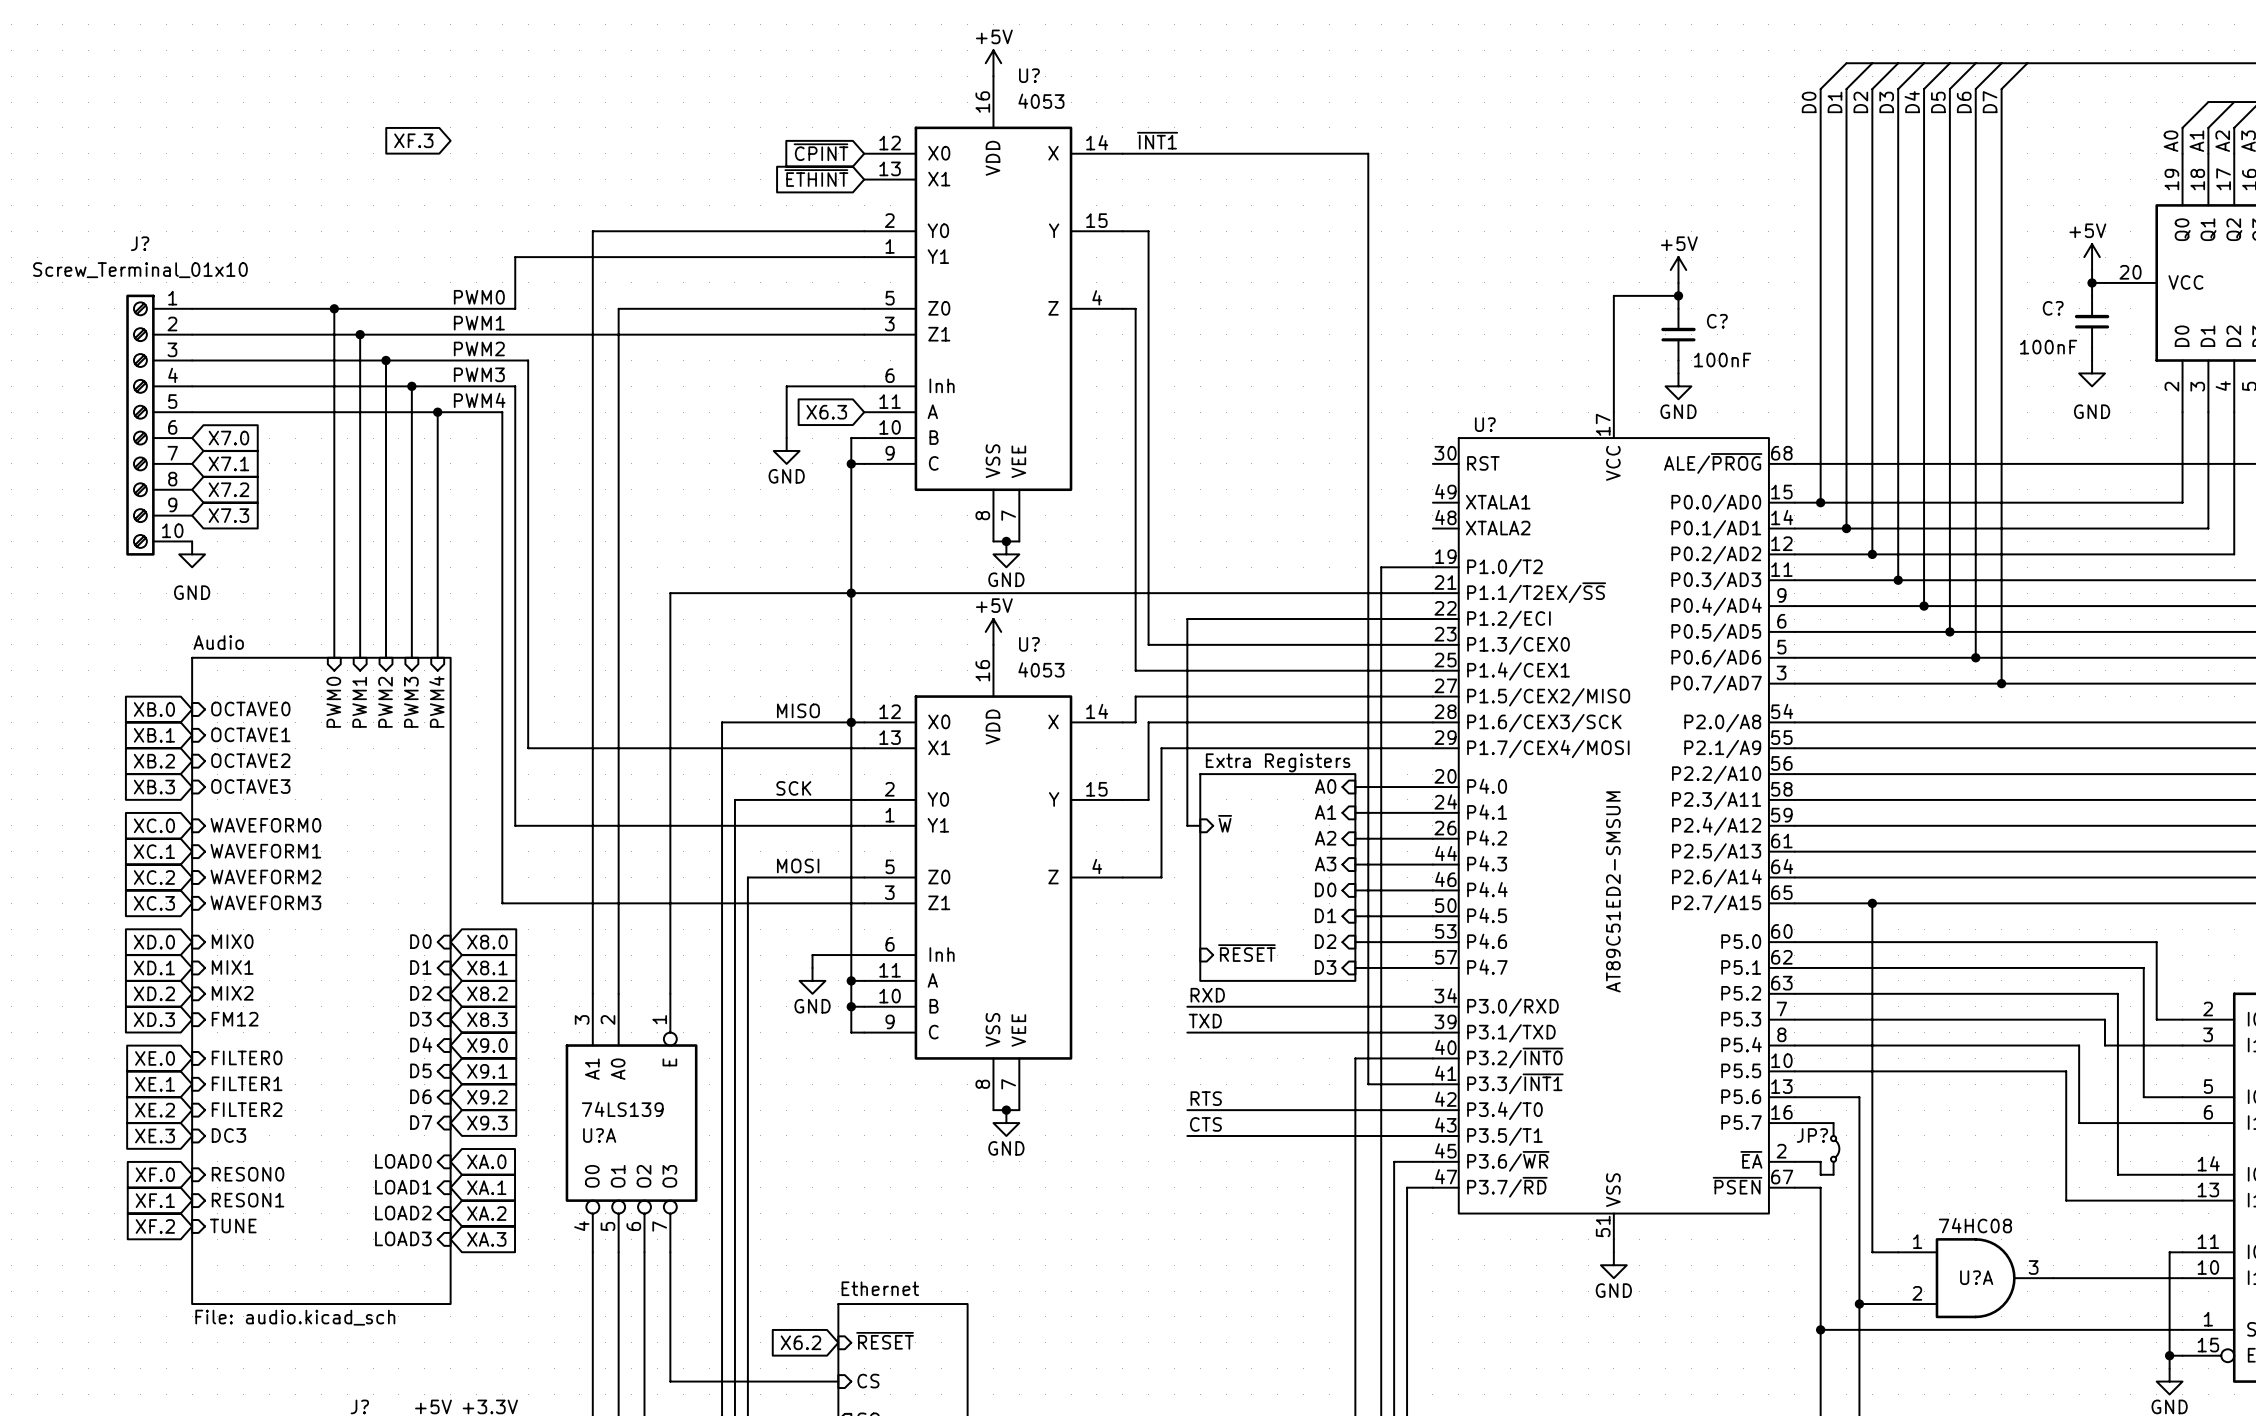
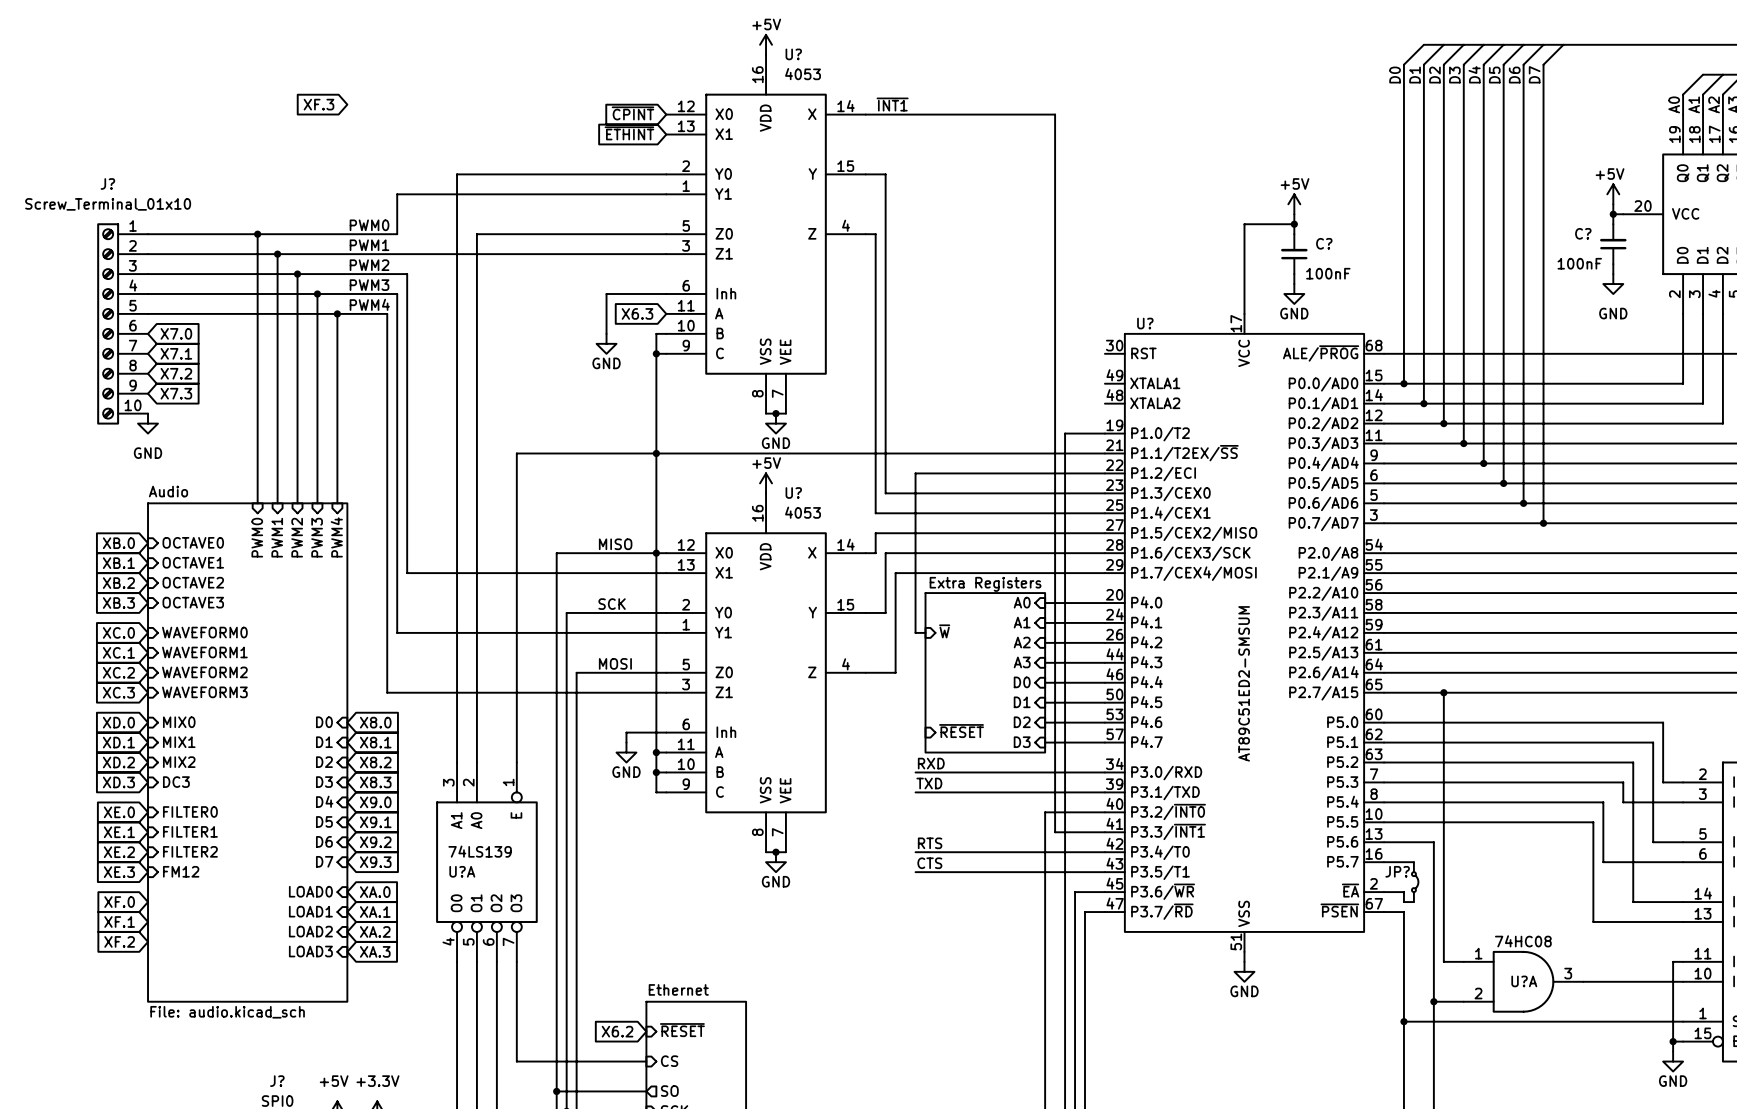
sheet pin: FM12 (235, 1019) -> DC3 (176, 782)
sheet pin: DC3 (228, 1135) -> FM12 (181, 871)
sheet pin: RESON0 (248, 1174) -> none
sheet pin: RESON1 (248, 1200) -> none
sheet pin: TUNE (233, 1225) -> none

